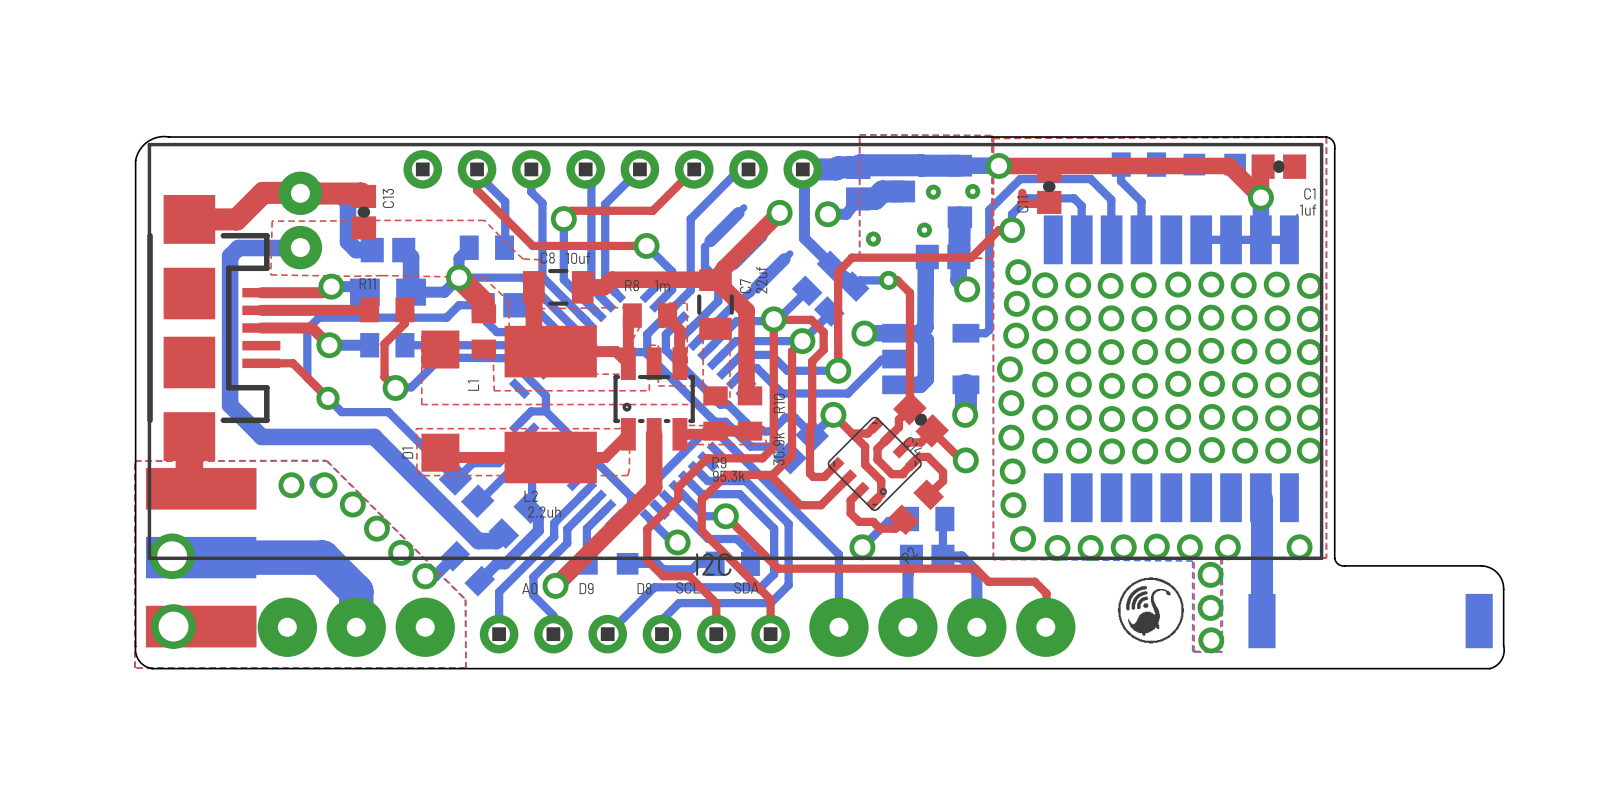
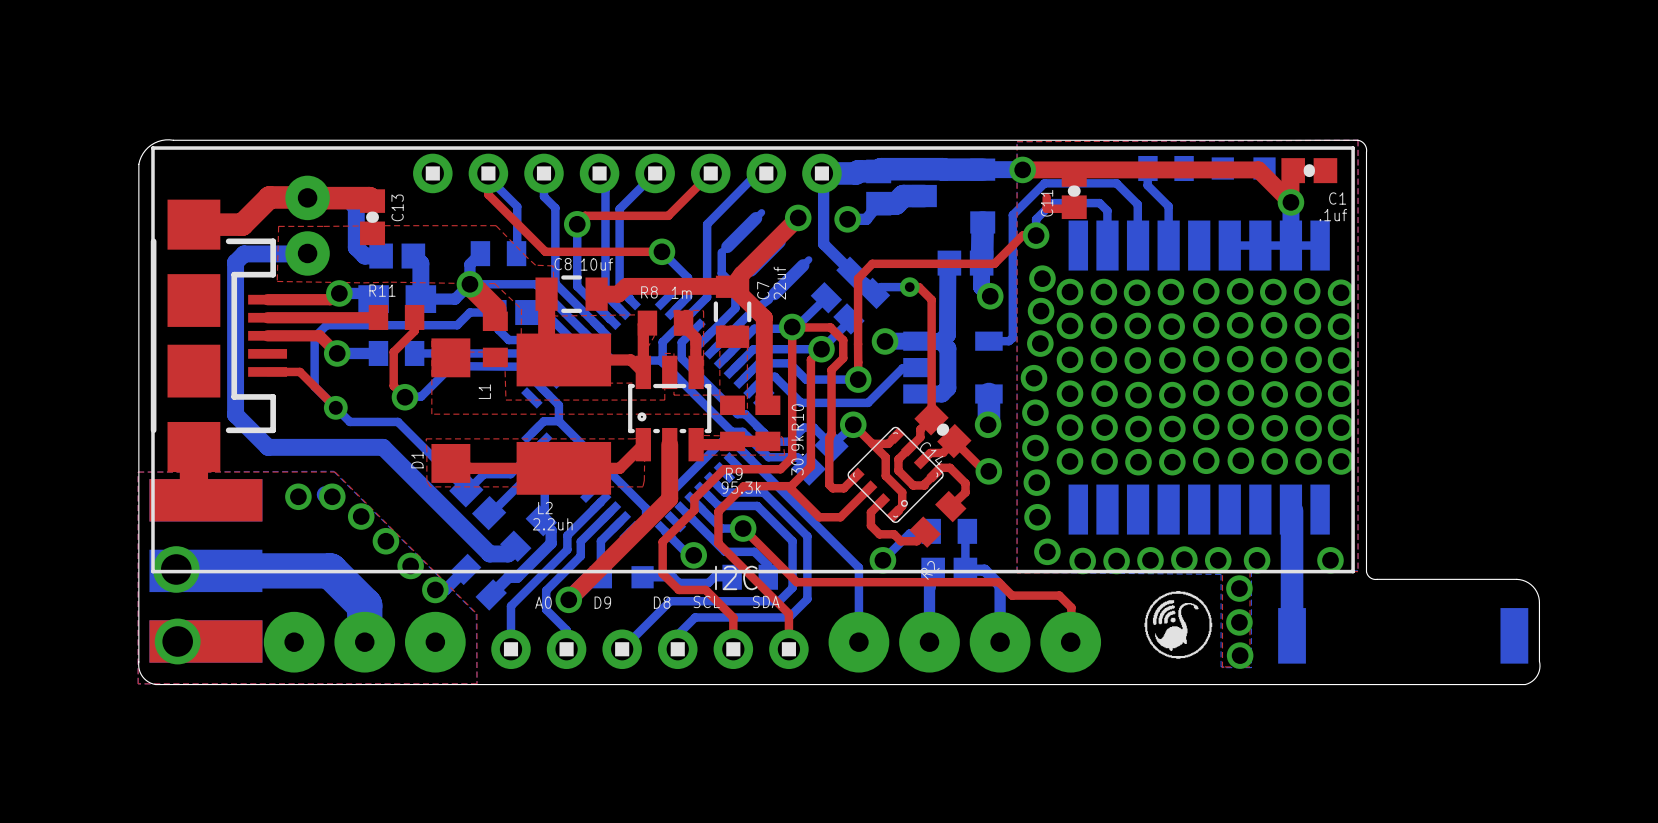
top zone outline: (859, 134) (992, 135) (992, 258) (859, 257) (859, 134) -> none
via: (972, 191) -> none
via: (933, 192) -> none
via: (924, 230) -> none
via: (873, 239) -> none

